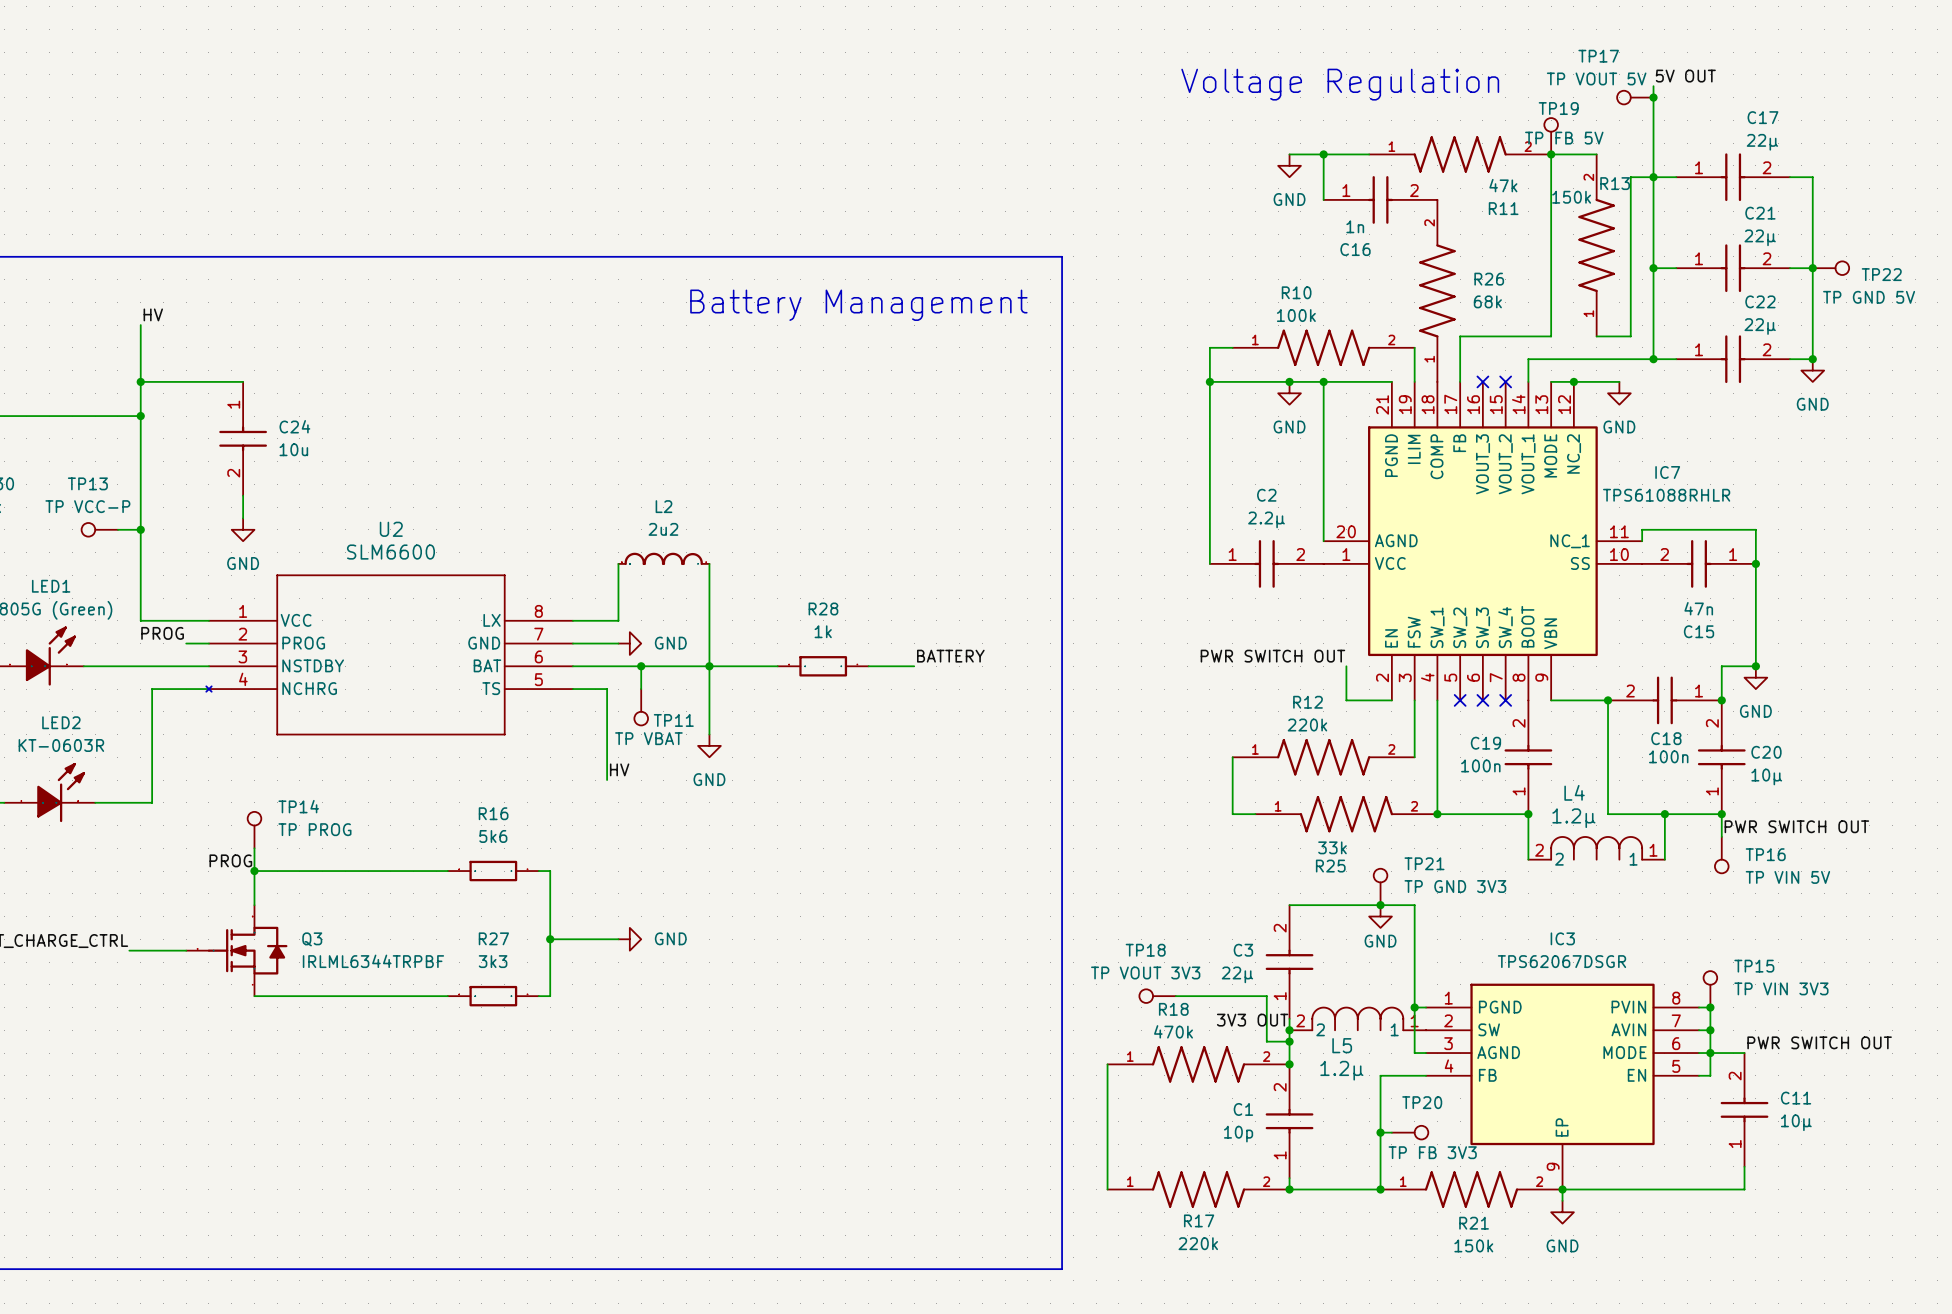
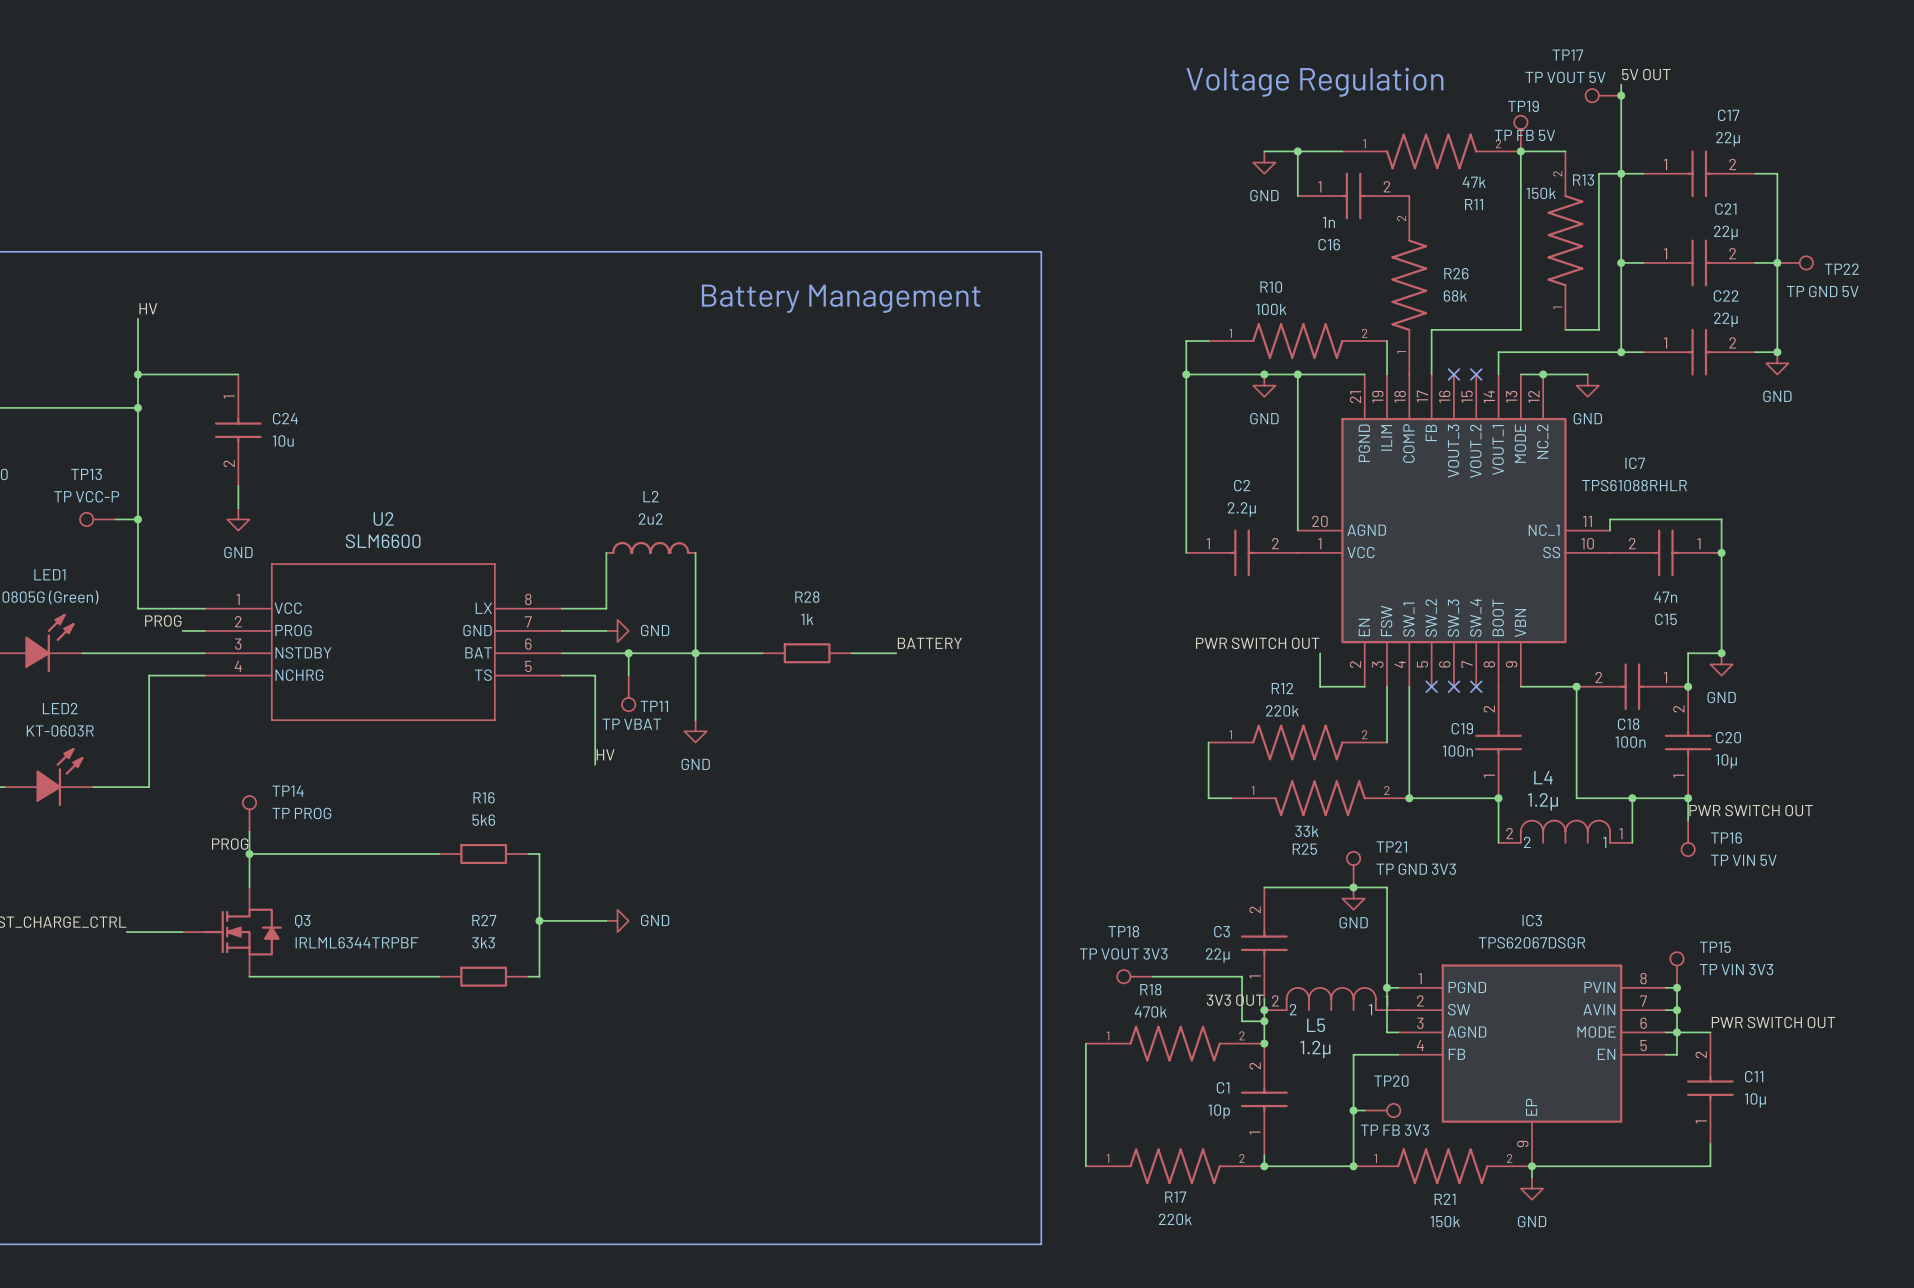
U2 symbol: [206, 574, 573, 736] -> [204, 563, 562, 721]

